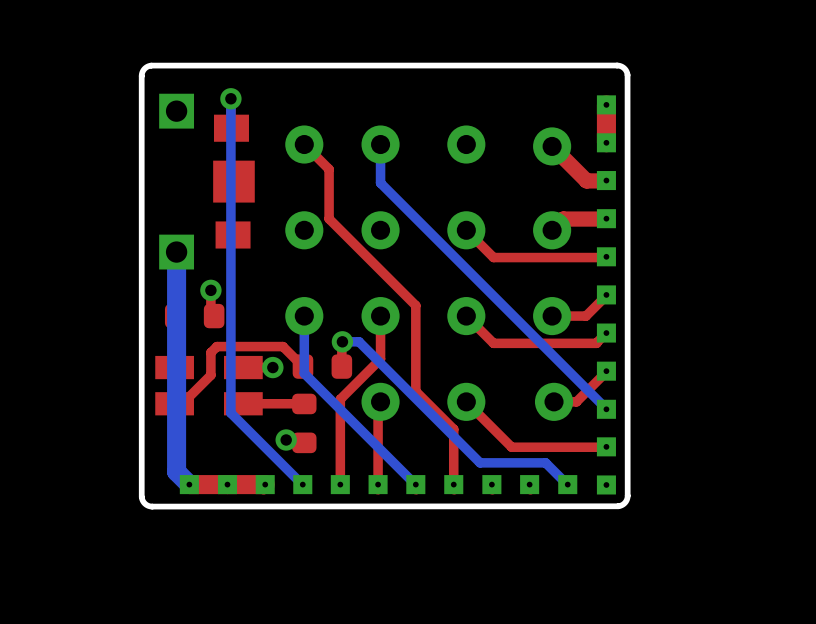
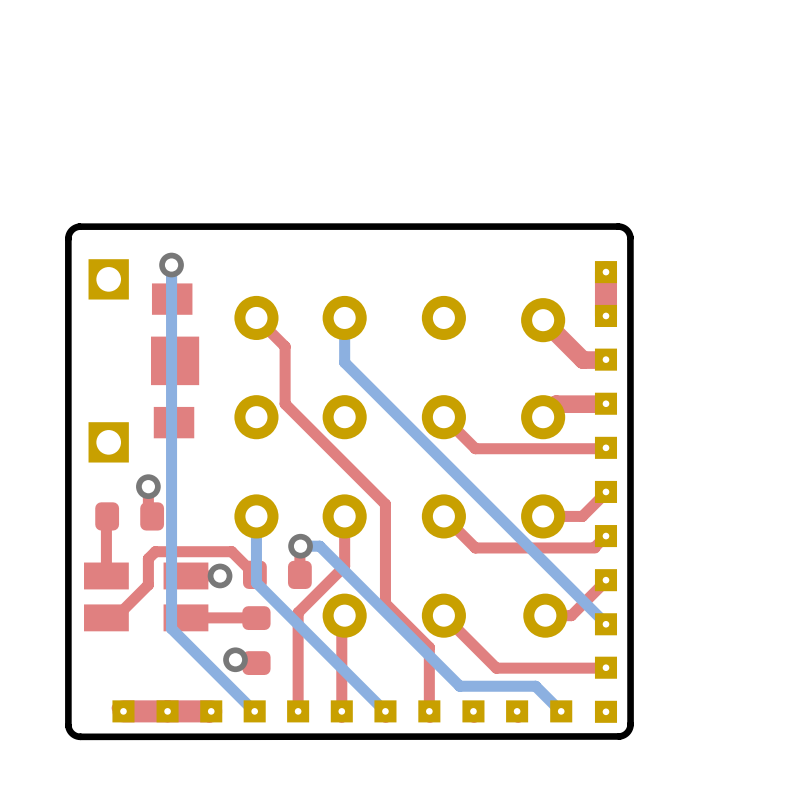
bottom track: (176, 252) (176, 471) (189, 484) -> none

